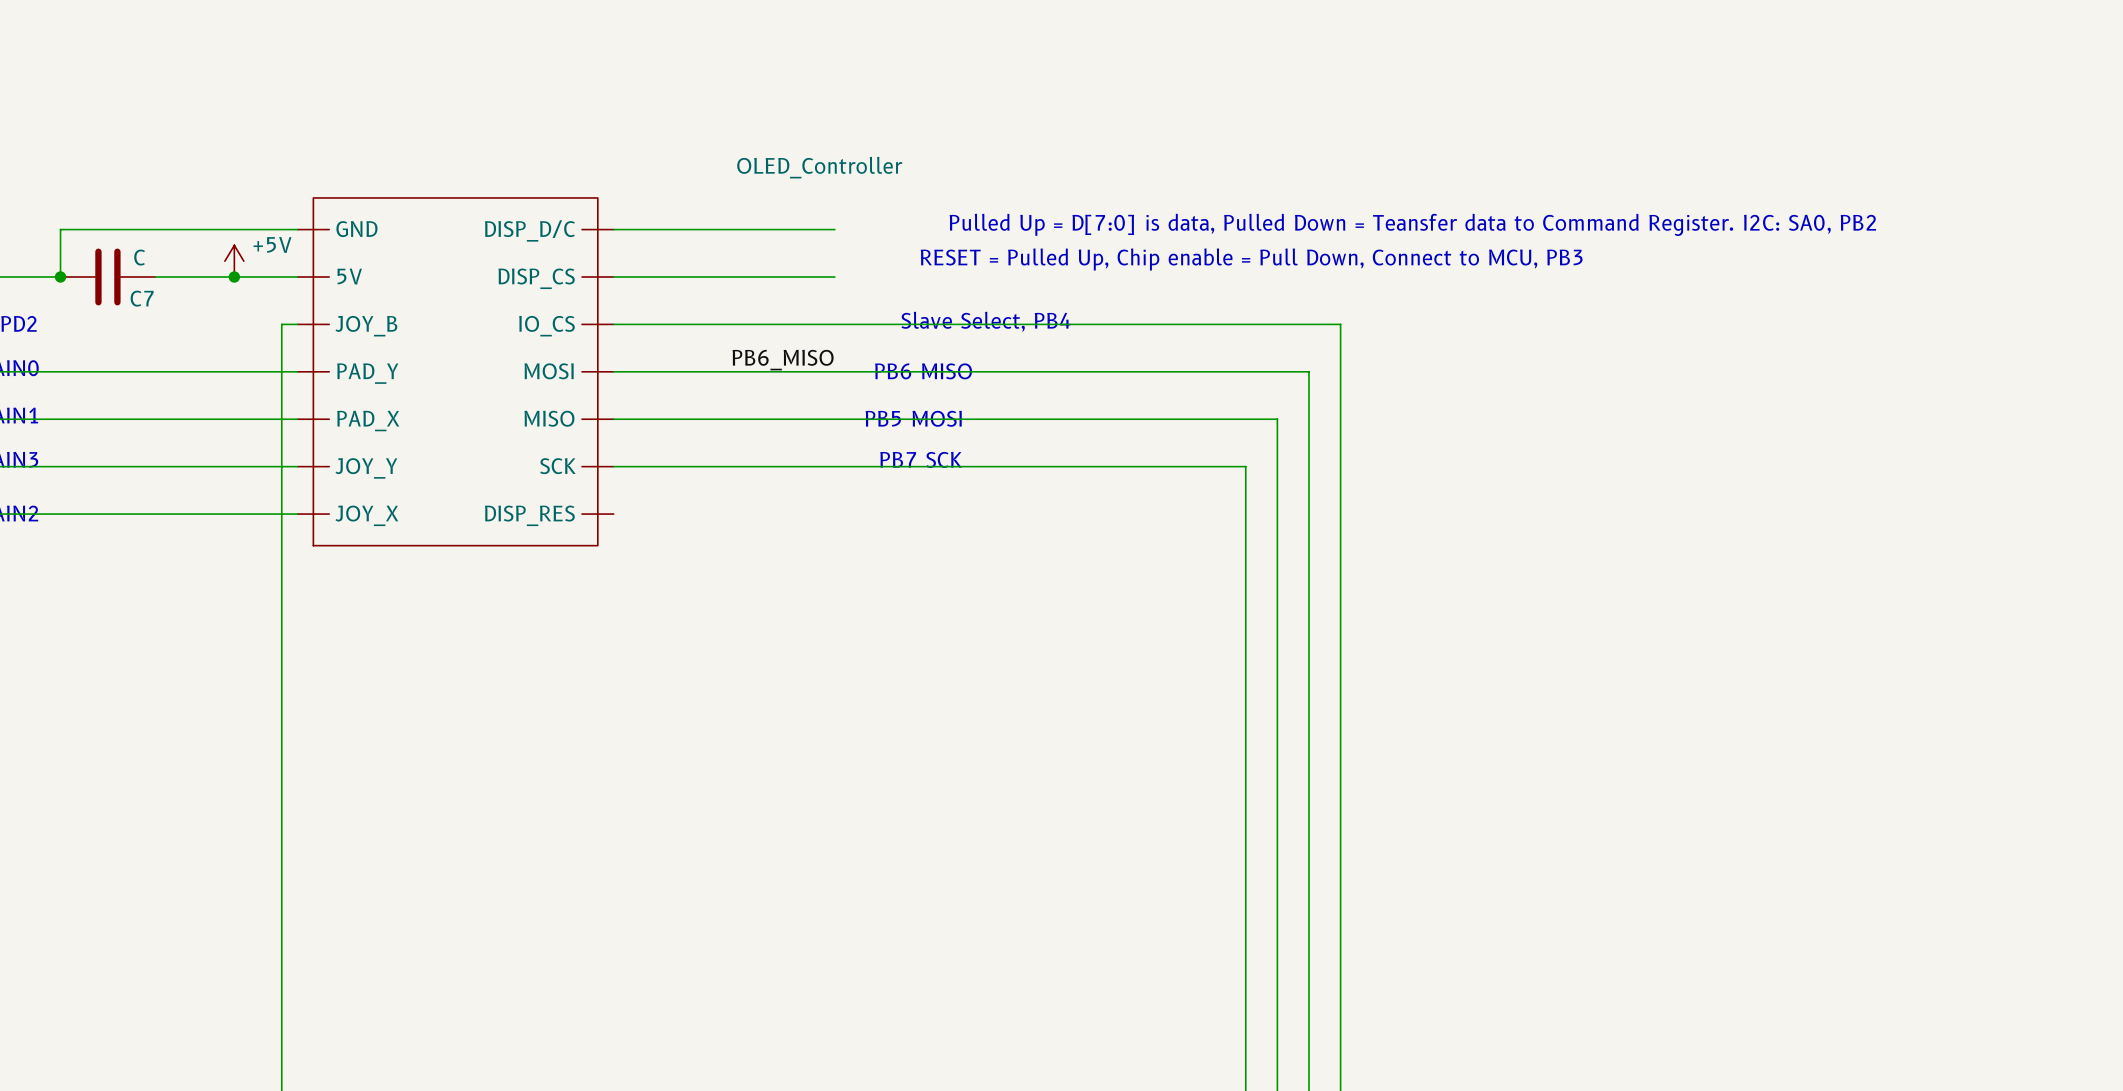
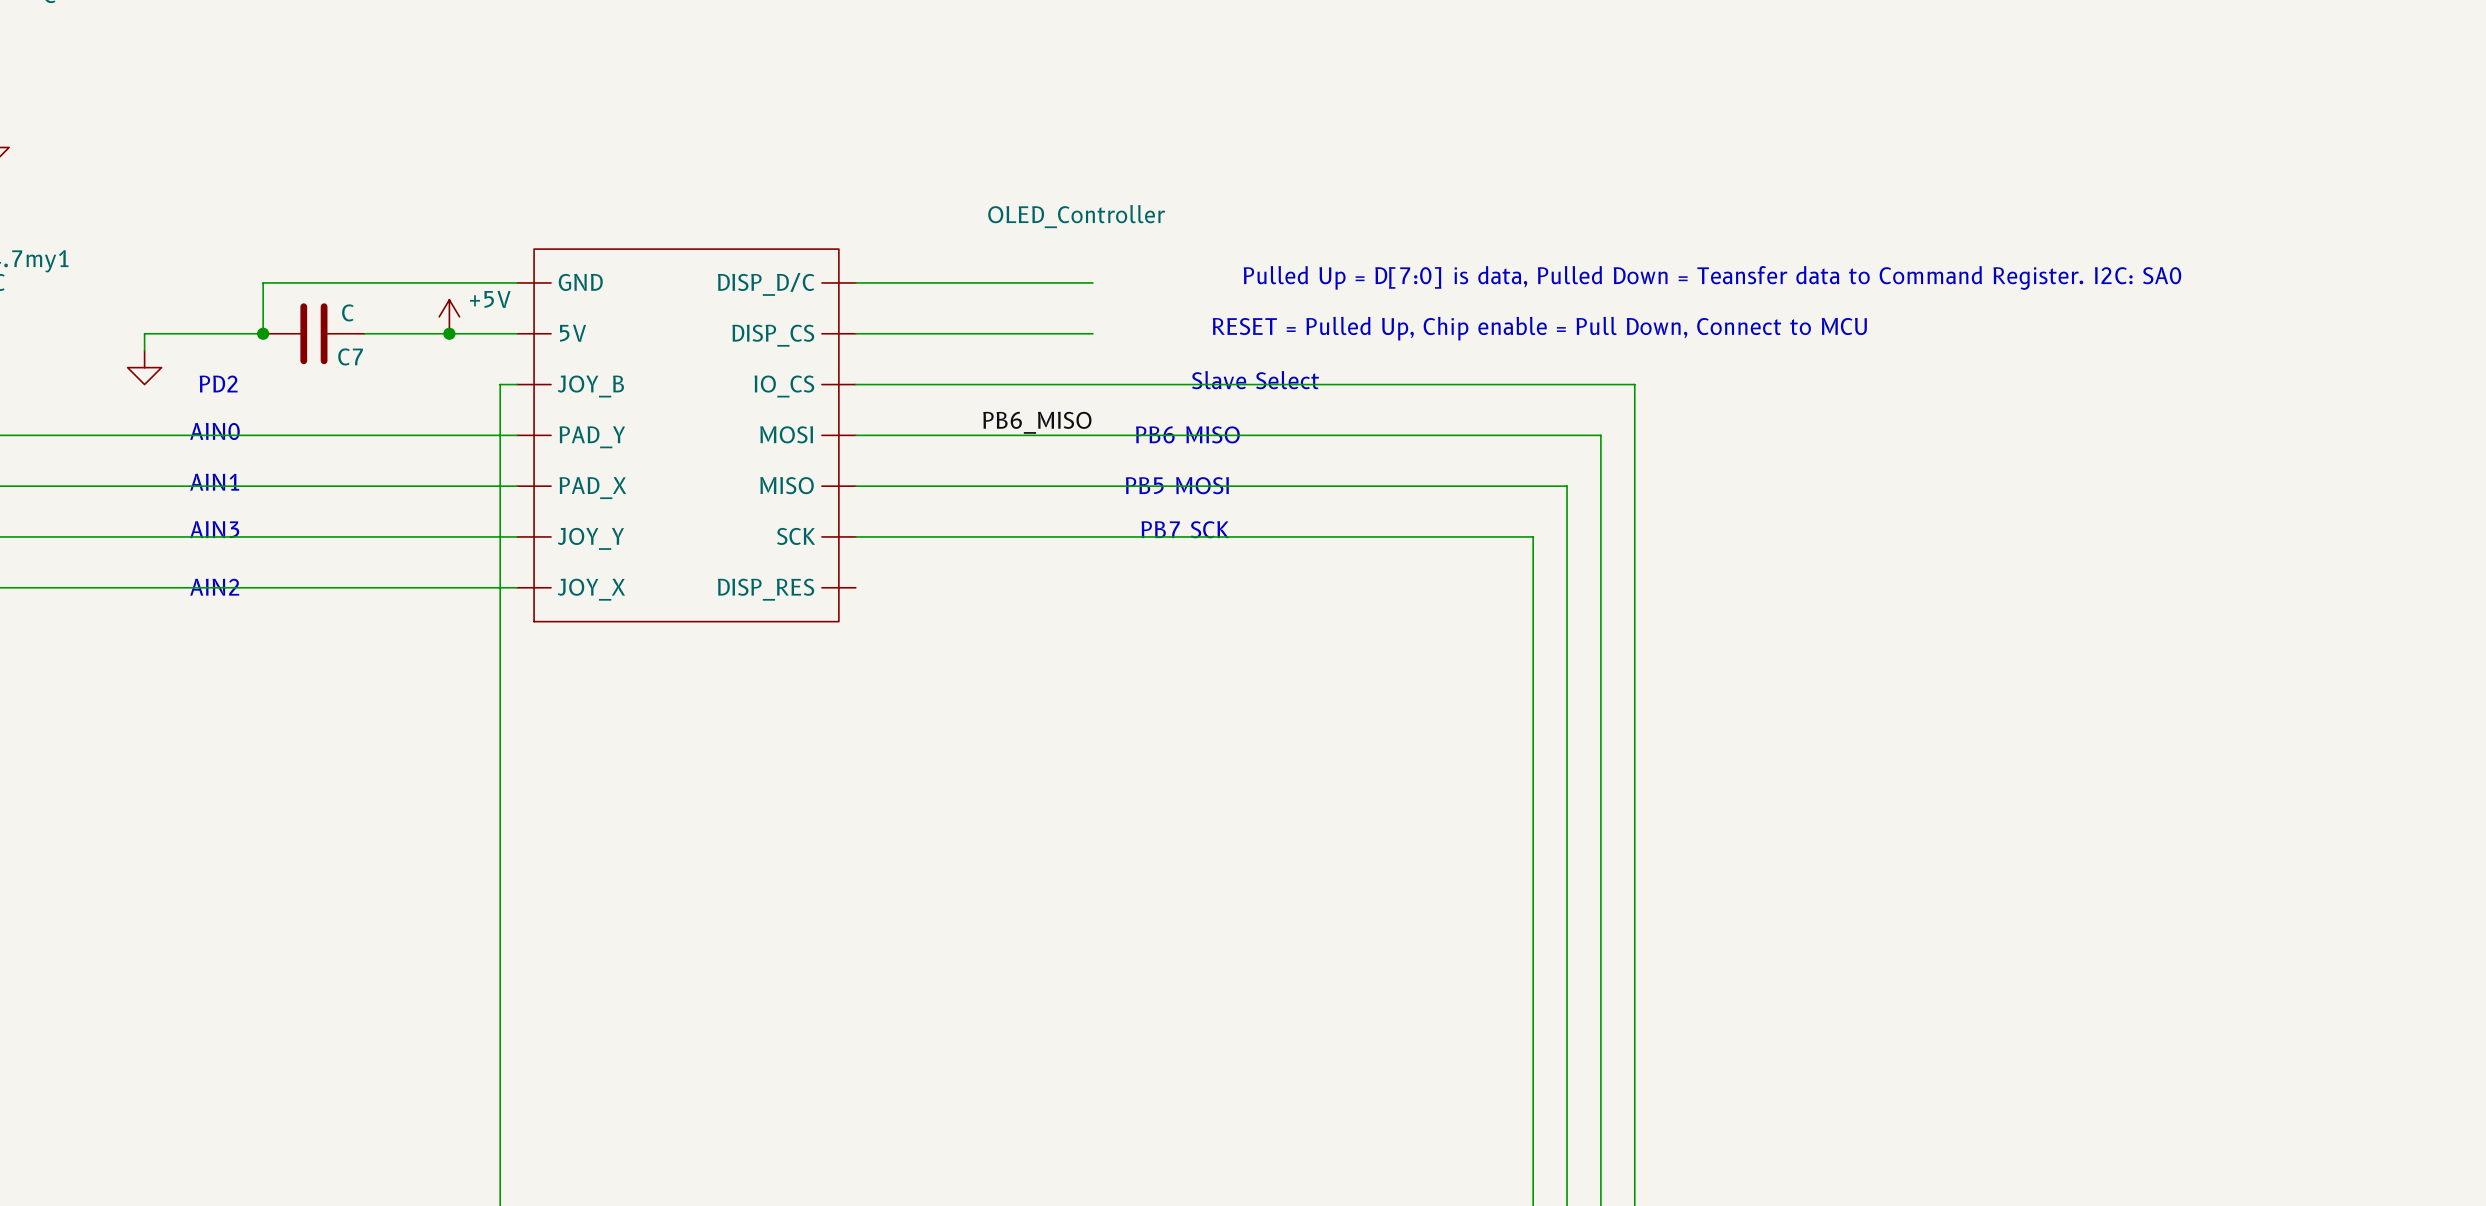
text: Pulled Up = D[7:0] is data, Pulled Down = Teansfer data to Command Register. I2C: SA0, PB2 (1412, 224) -> Pulled Up = D[7:0] is data, Pulled Down = Teansfer data to Command Register. I2C: SA0 (1712, 277)
text: RESET = Pulled Up, Chip enable = Pull Down, Connect to MCU, PB3 (1251, 259) -> RESET = Pulled Up, Chip enable = Pull Down, Connect to MCU (1539, 328)
text: Slave Select, PB4 (985, 321) -> Slave Select (1255, 380)

